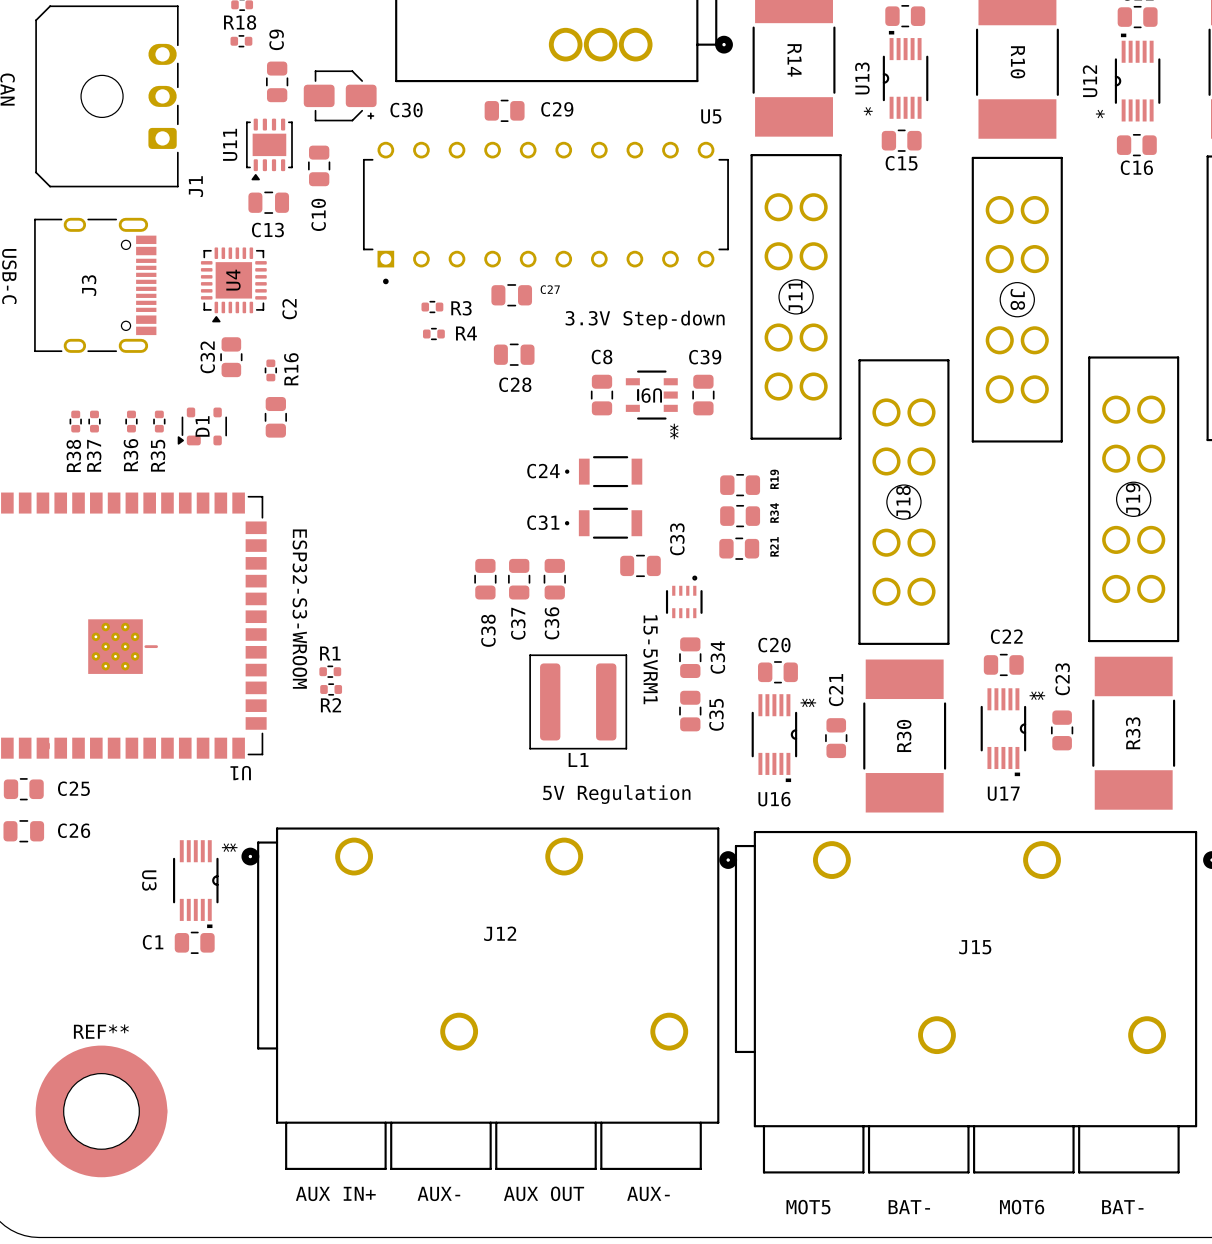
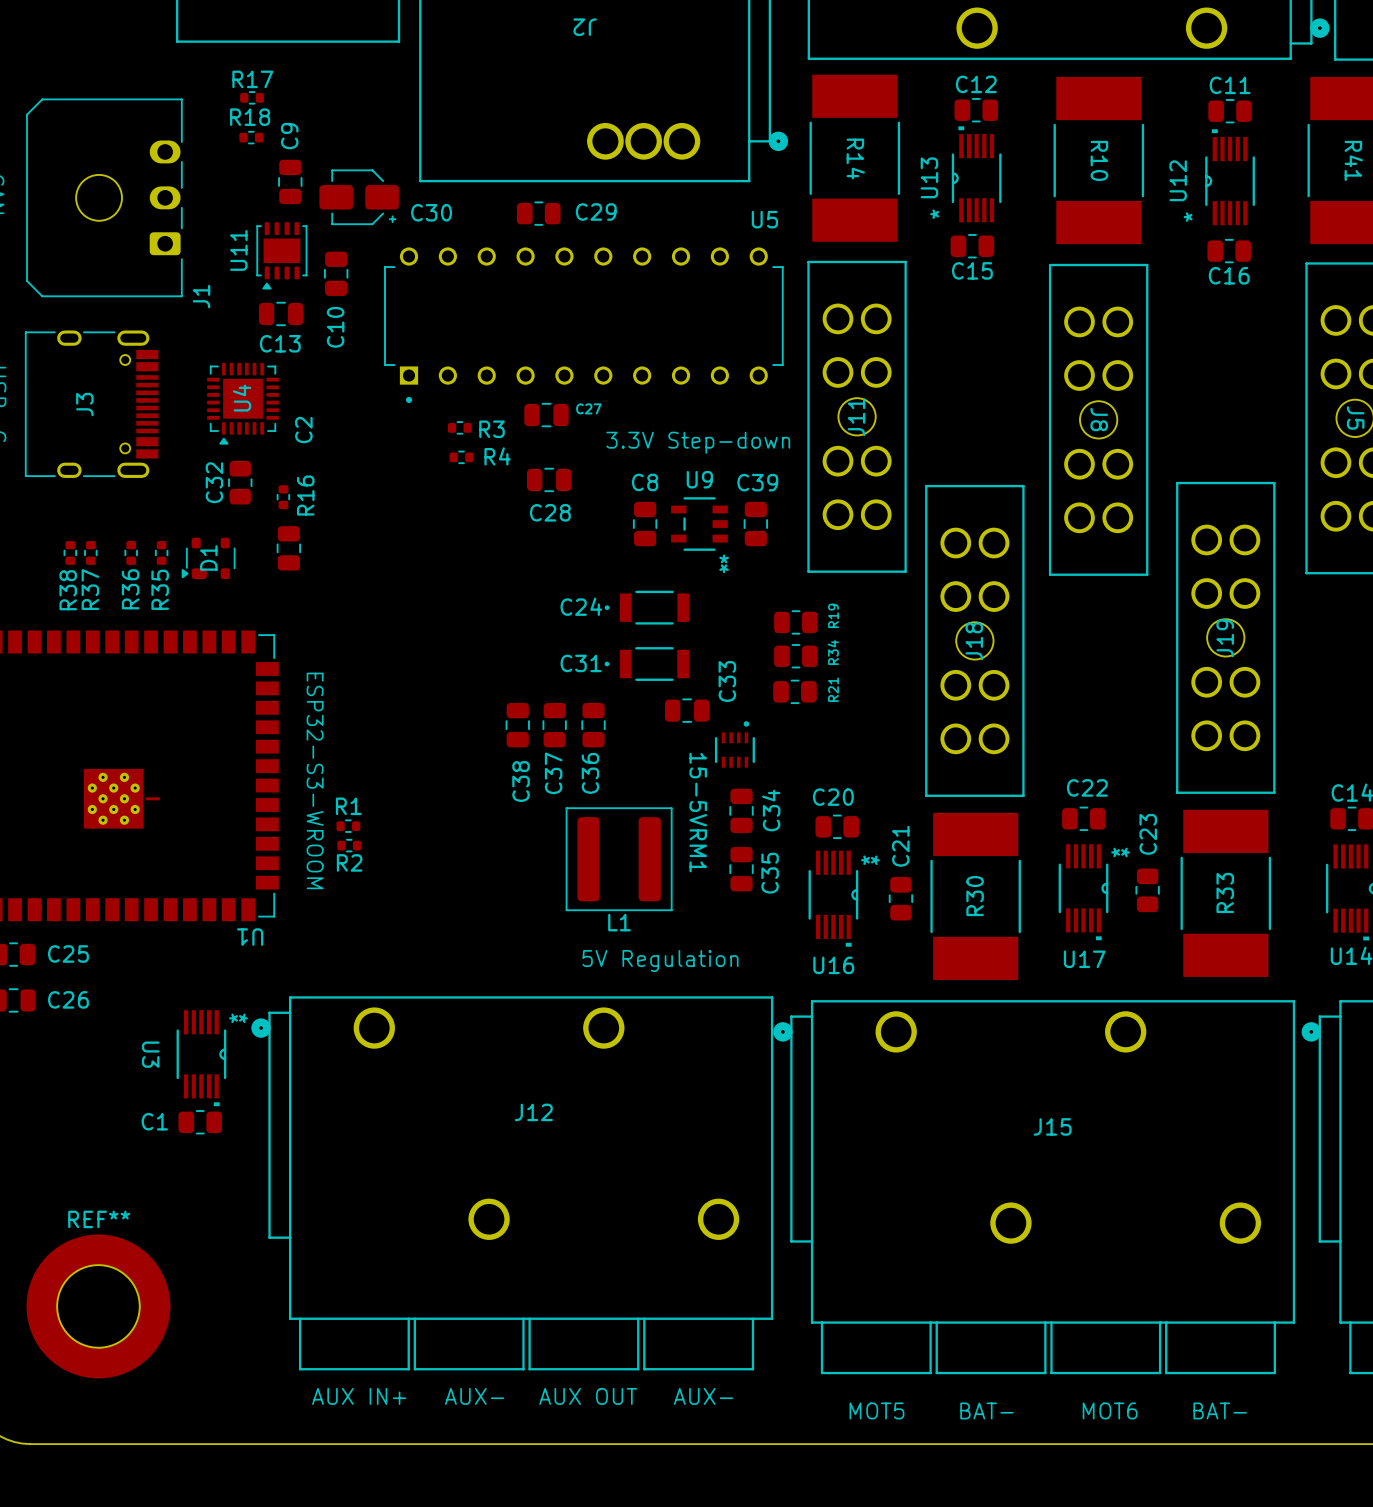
U9 name rotation: 0° (651, 395) -> 180° (699, 479)
U9 name position: U9 (651, 395) -> U9 (699, 479)

